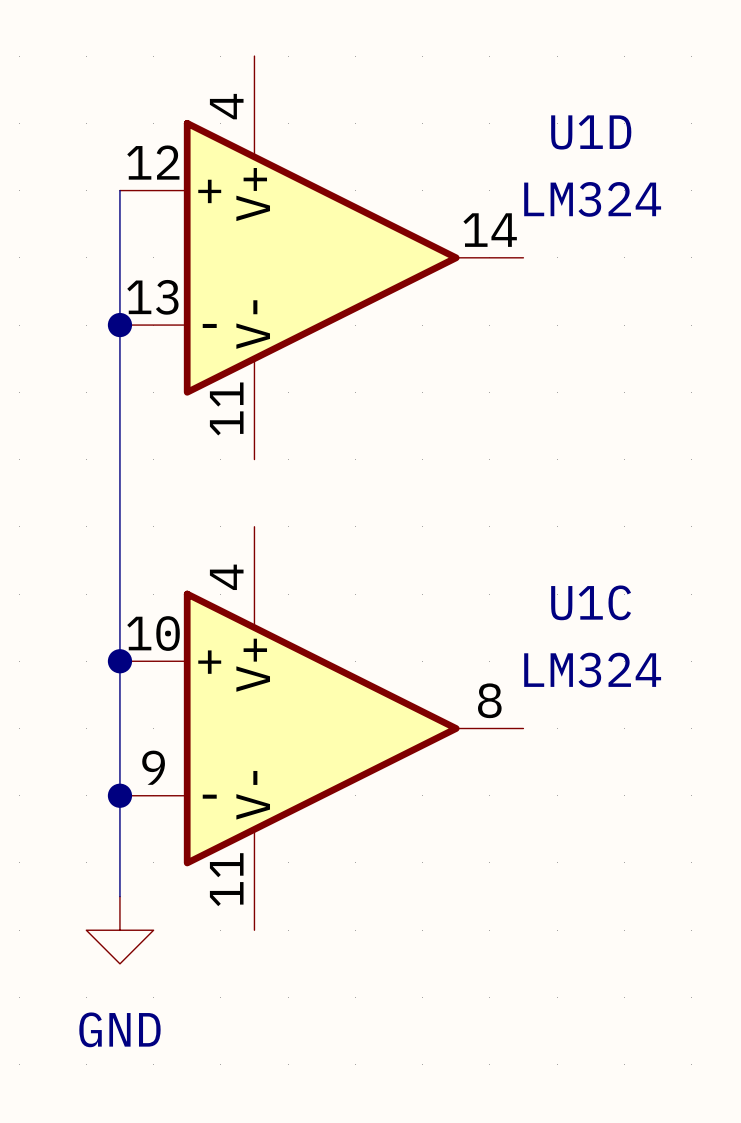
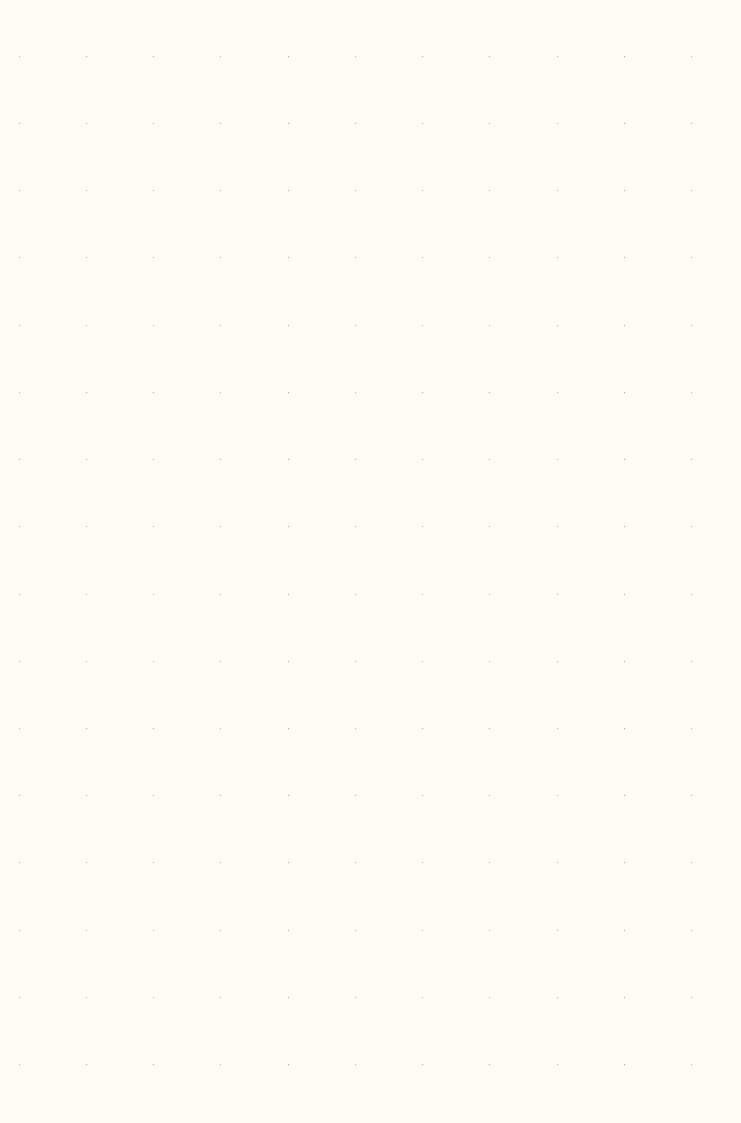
wire: (119, 190) (119, 896) -> none
U1D: LM324 (321, 257) -> none
junction: (119, 325) -> none
junction: (119, 661) -> none
U1C: LM324 (321, 728) -> none
junction: (119, 795) -> none
power symbol: GND (119, 930) -> none

